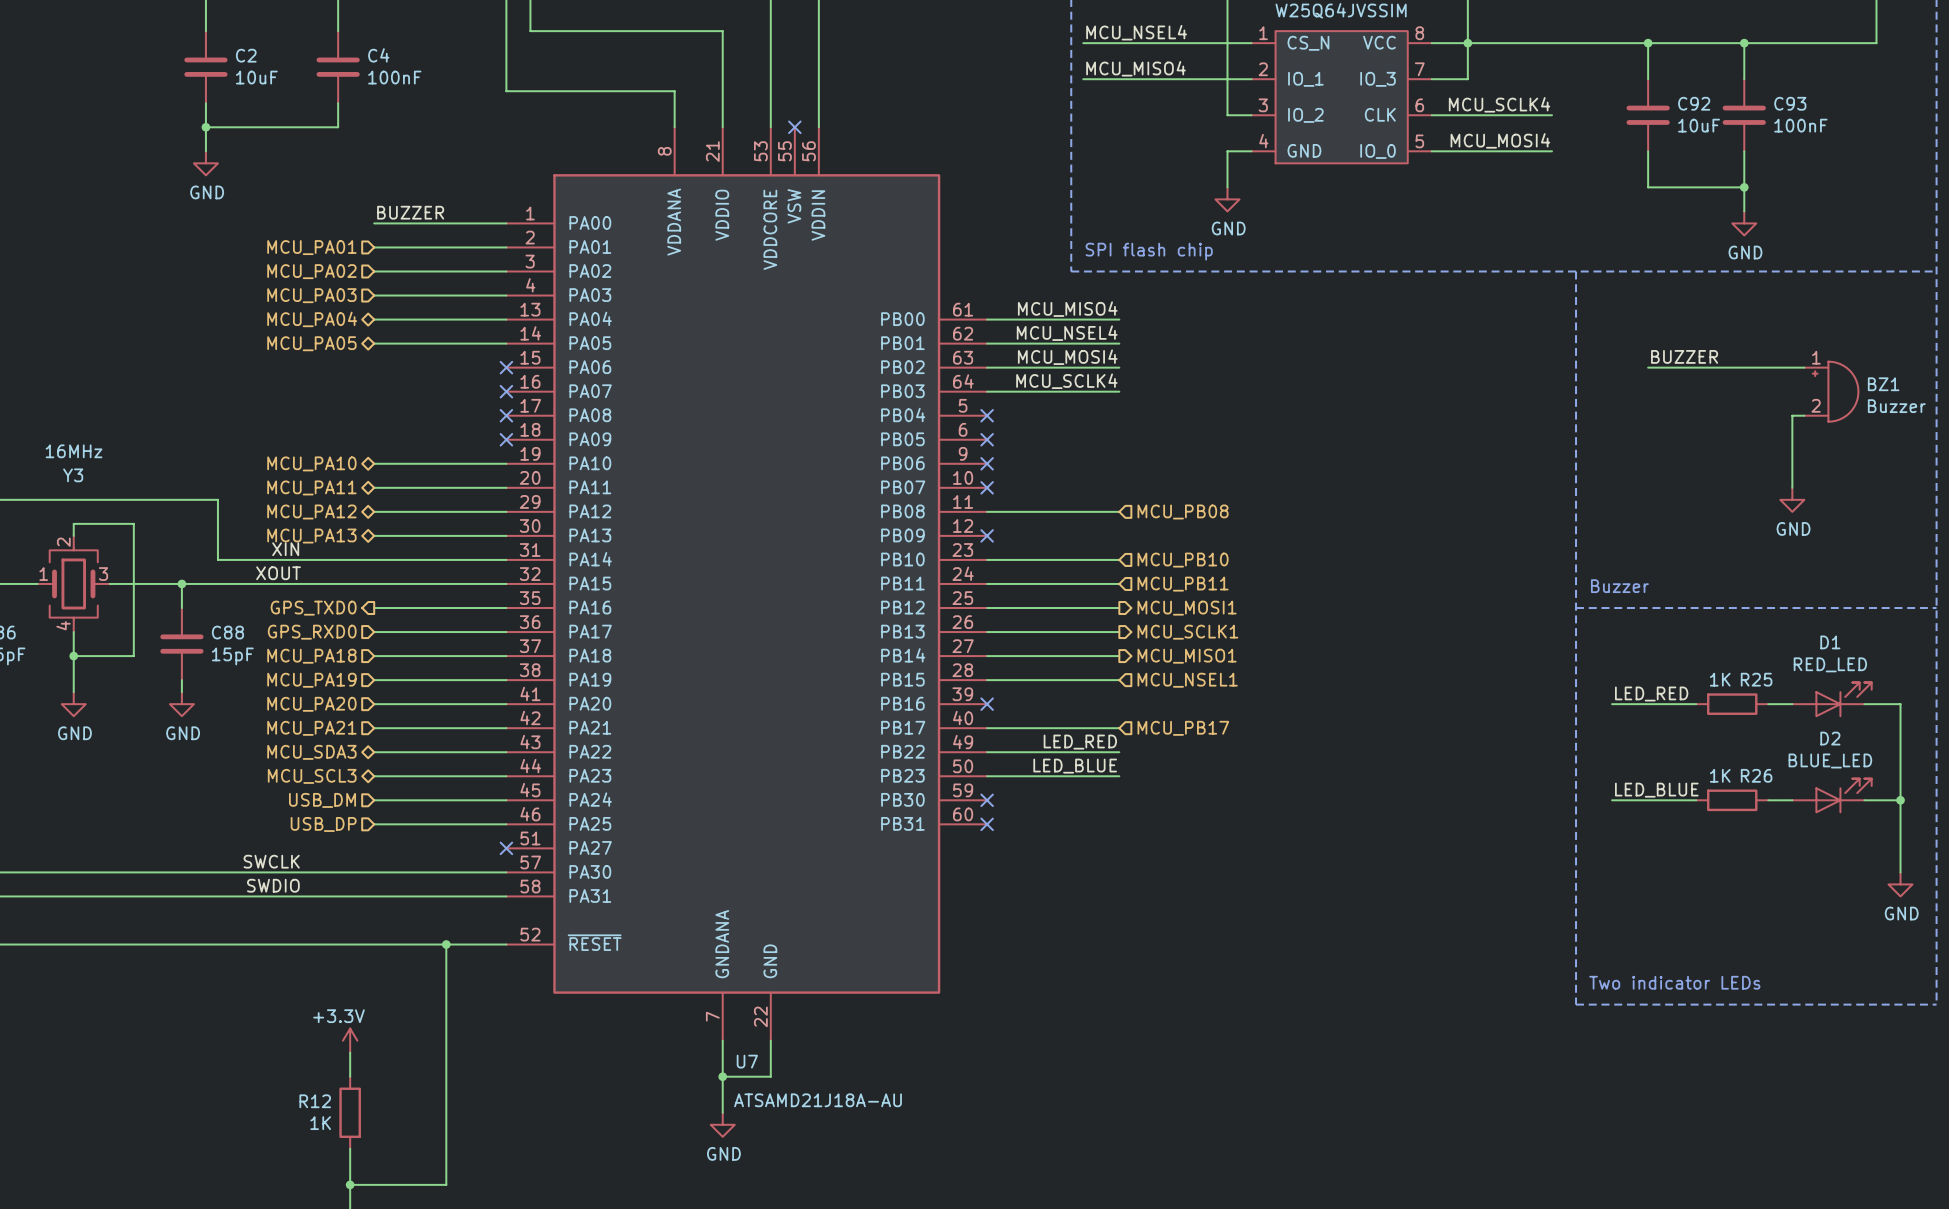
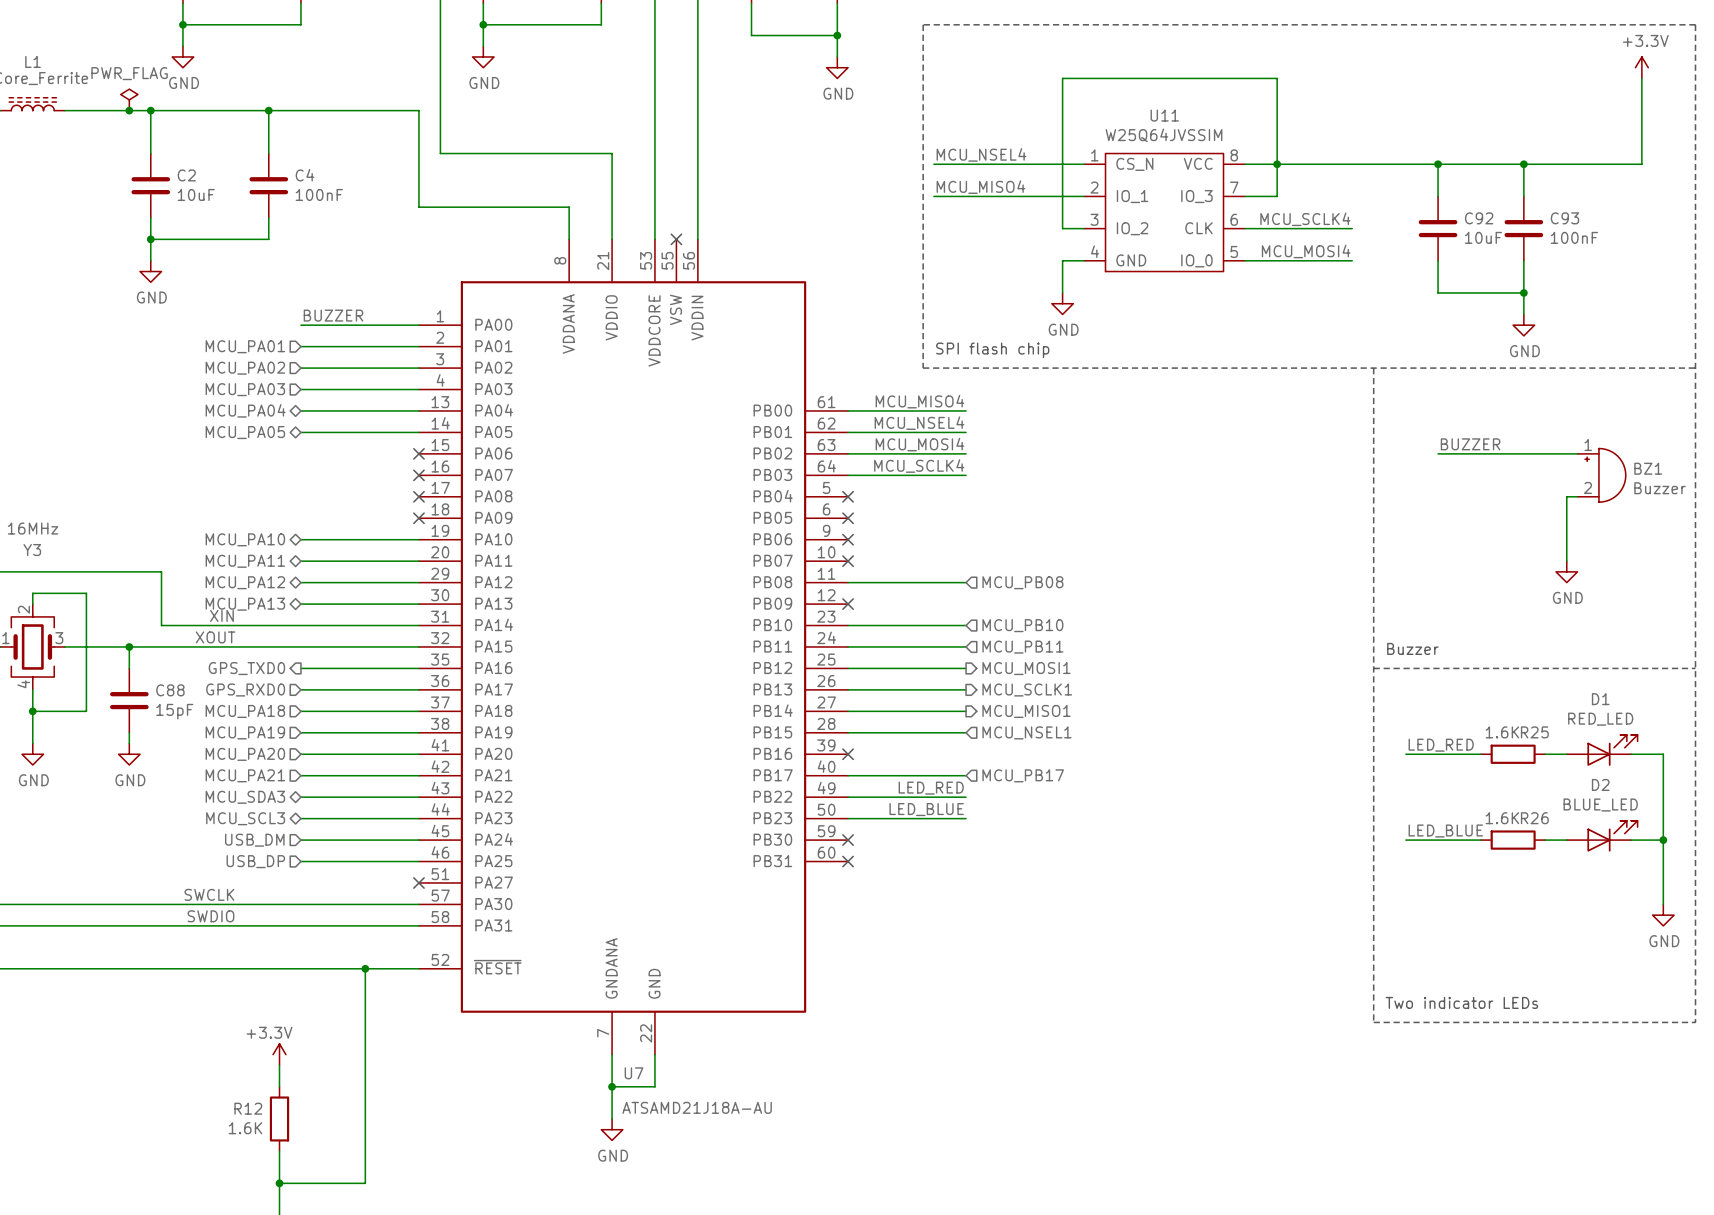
R25 value: 1K (1720, 679) -> 1.6K (1502, 732)
R26 value: 1K (1720, 775) -> 1.6K (1502, 818)
R12 value: 1K (320, 1123) -> 1.6K (245, 1128)

